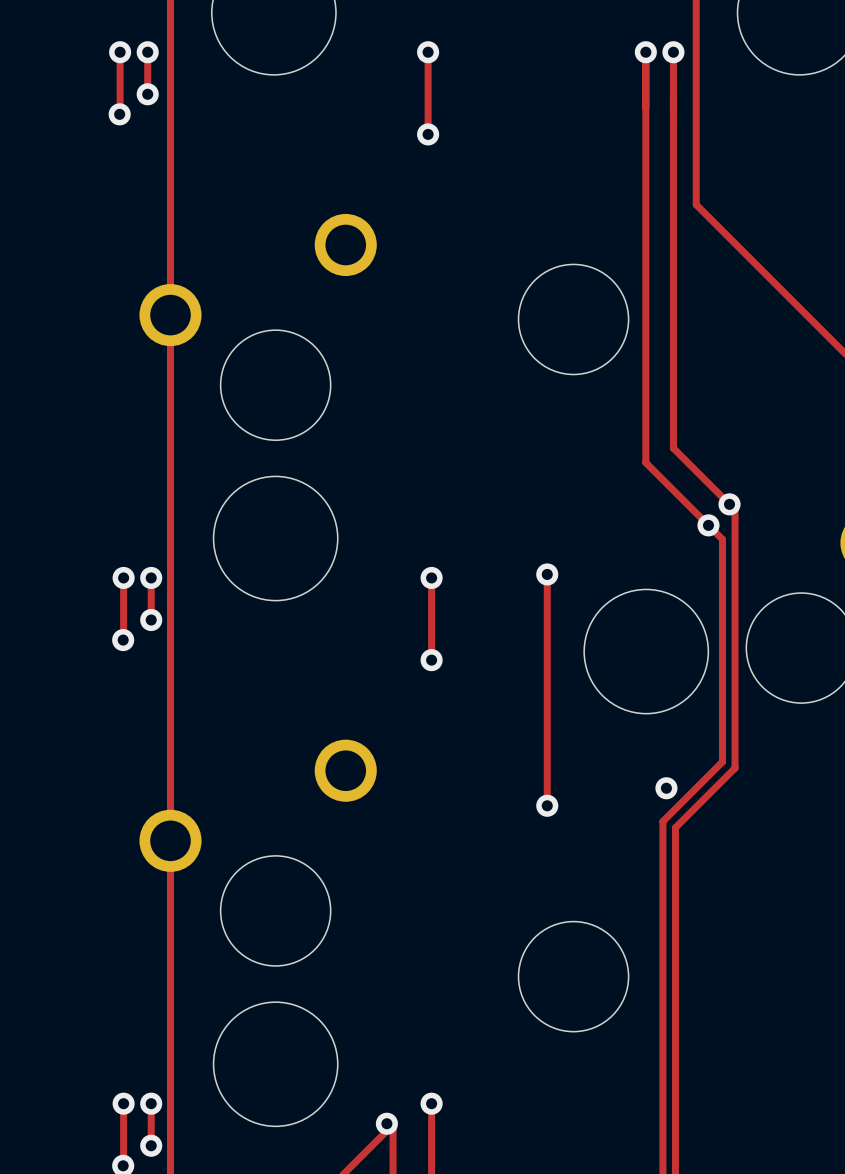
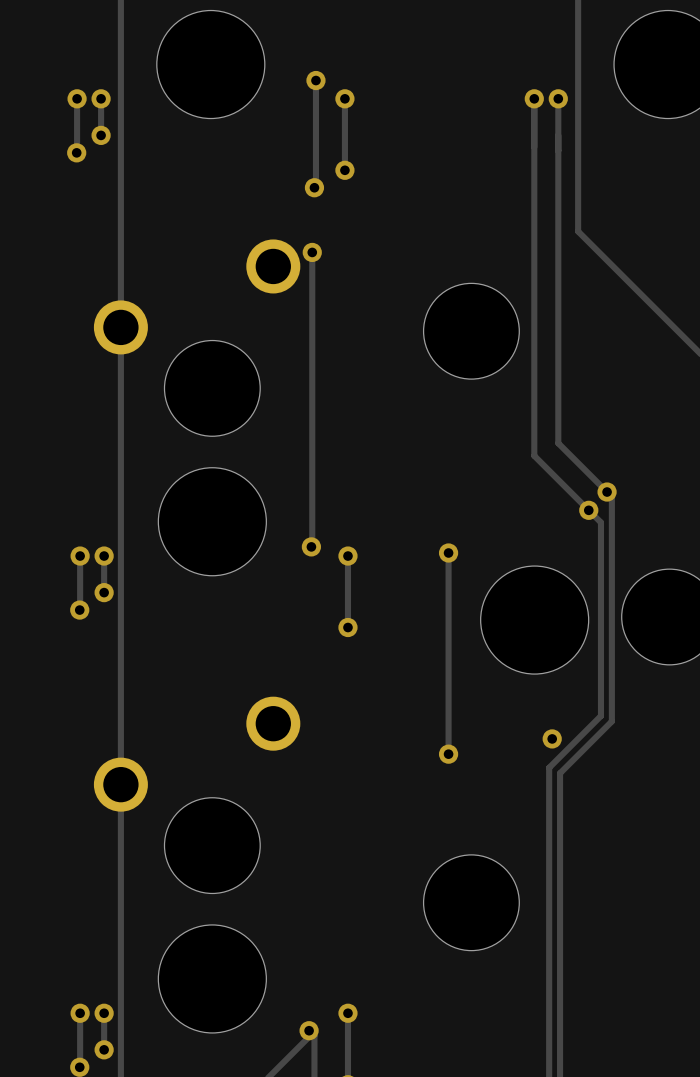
track: none -> (315, 80) (315, 186) (314, 187)
via: none -> (315, 80)
via: none -> (314, 187)
track: none -> (312, 252) (311, 546)
via: none -> (312, 252)
via: none -> (311, 546)

